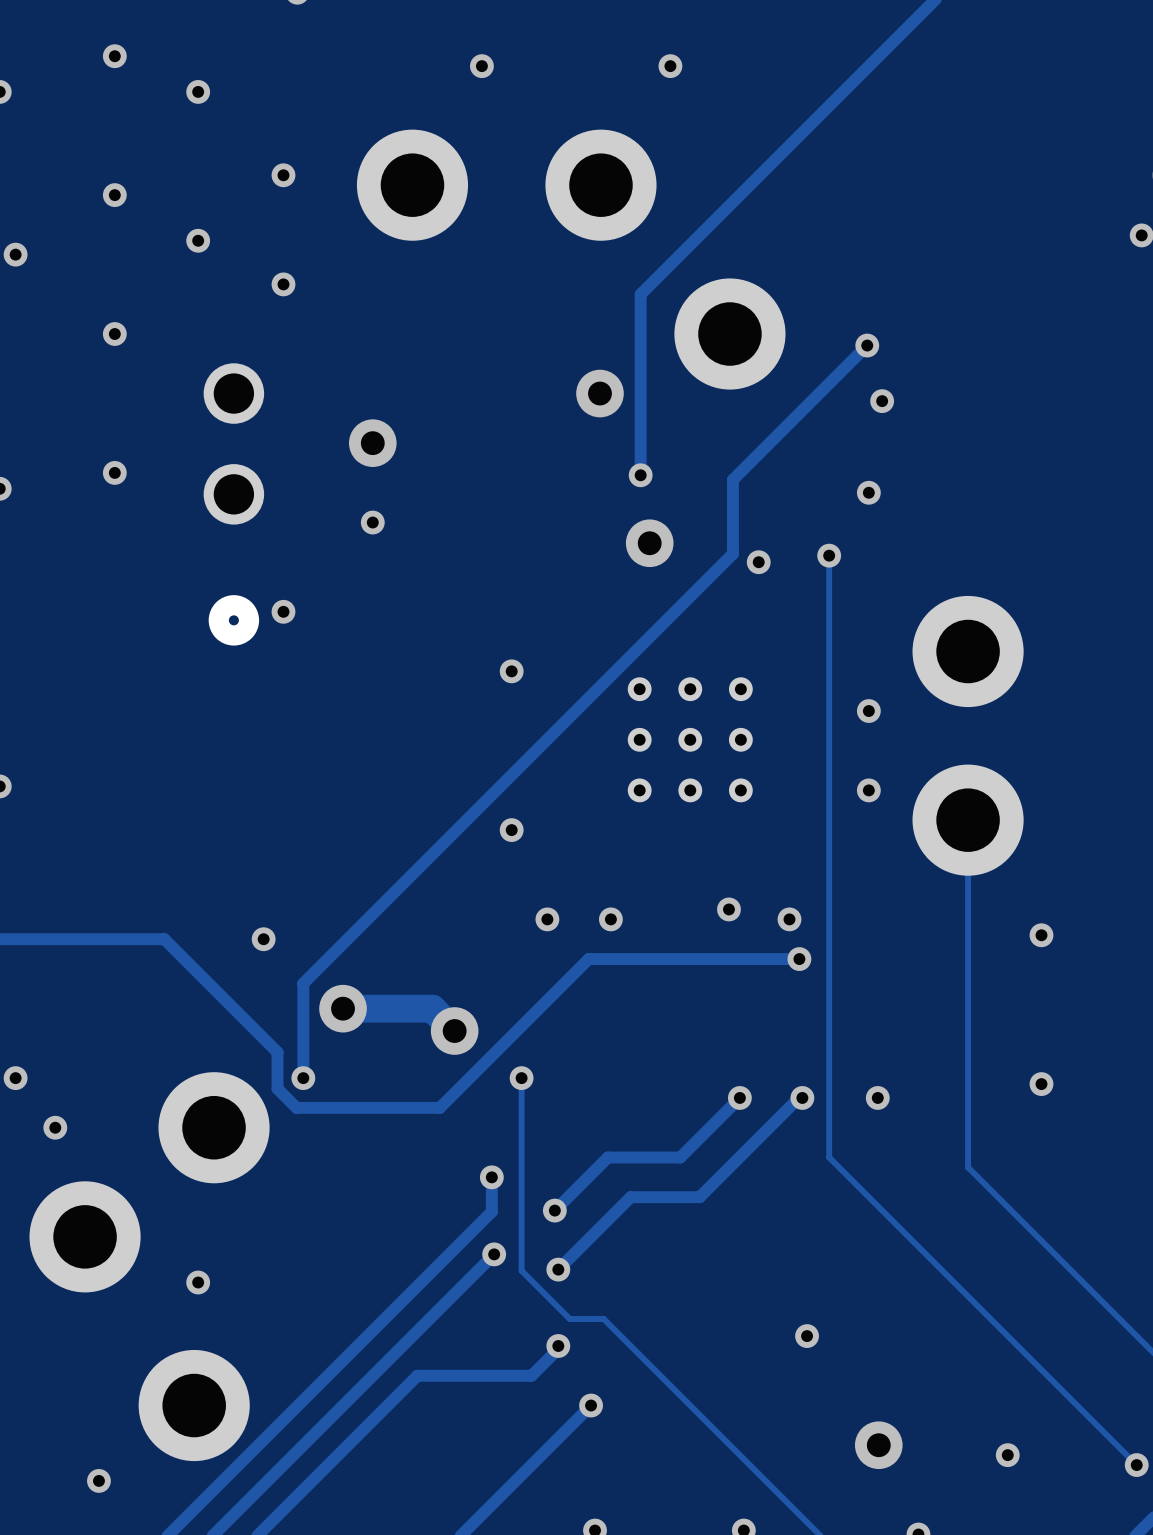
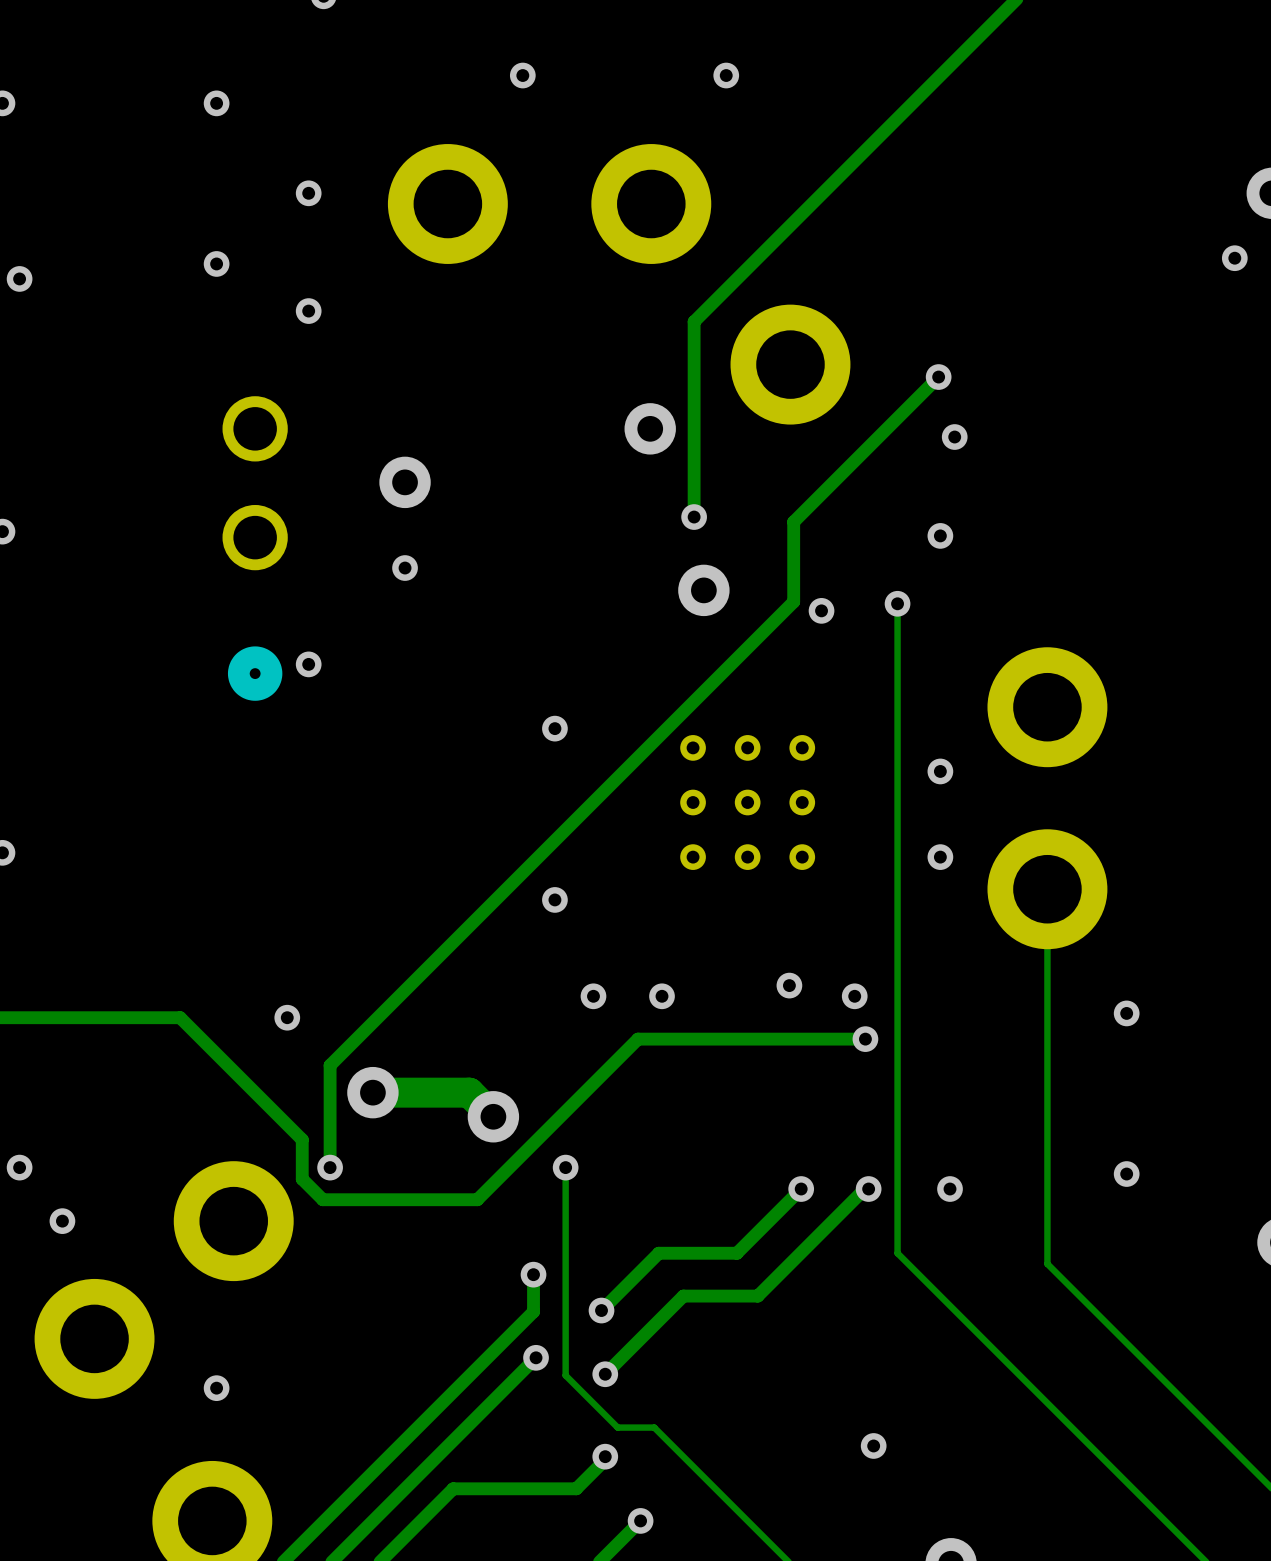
via: (114, 56) -> none
via: (114, 195) -> none
via: (114, 334) -> none
via: (114, 472) -> none

